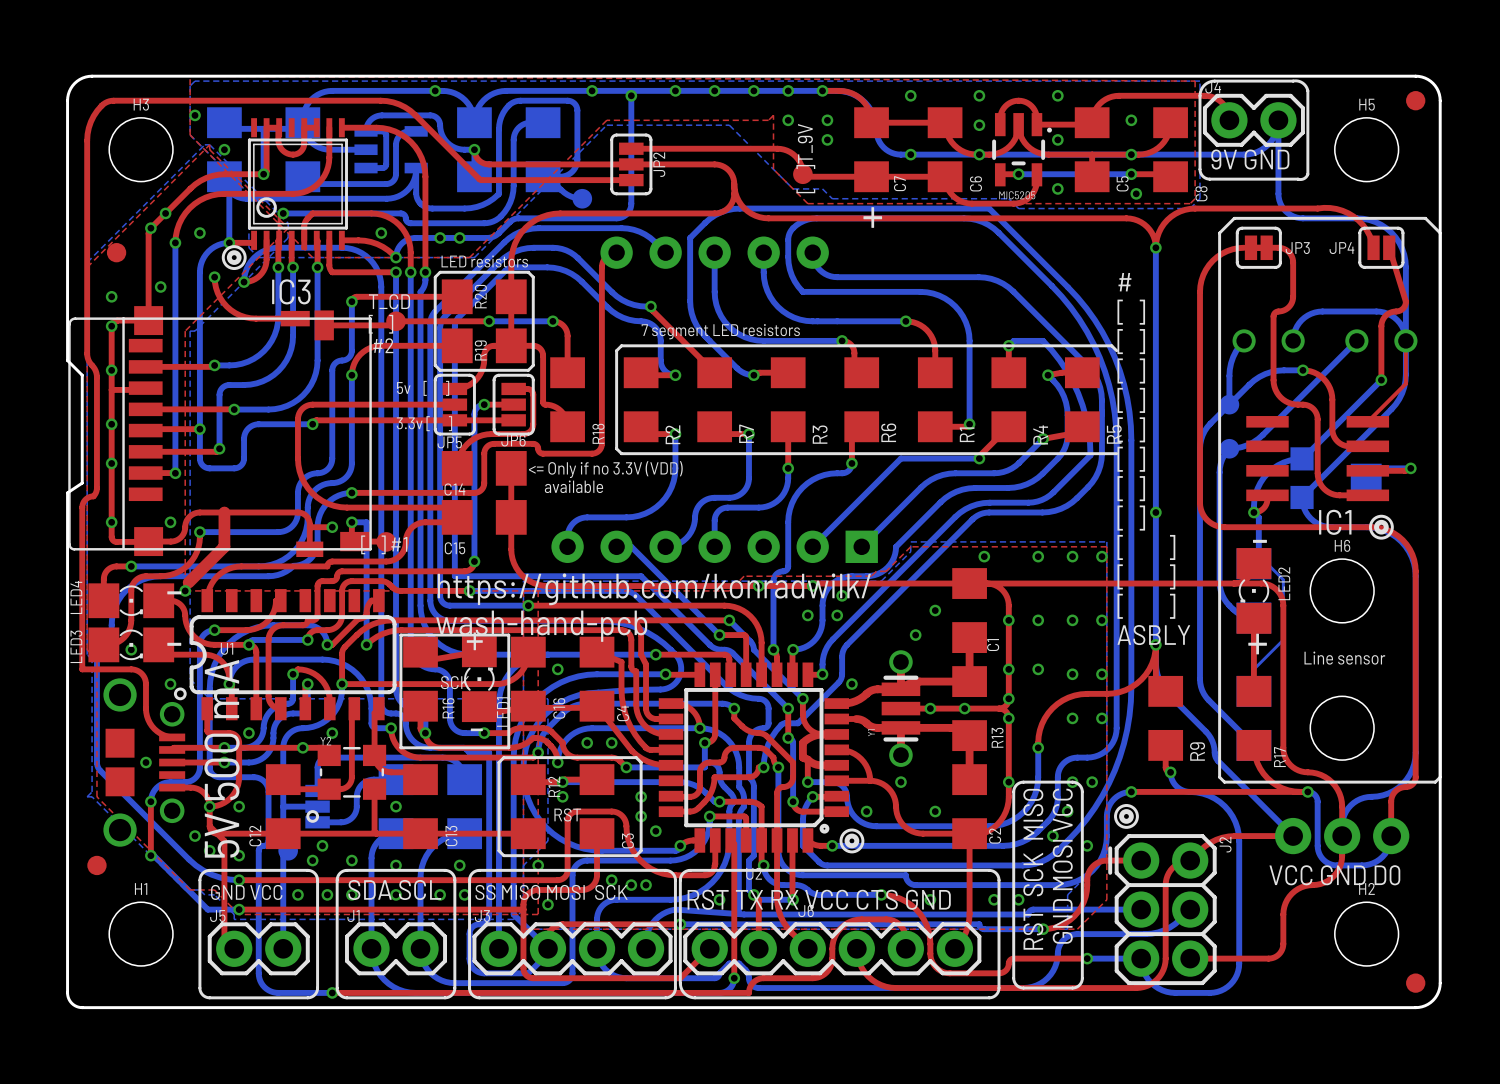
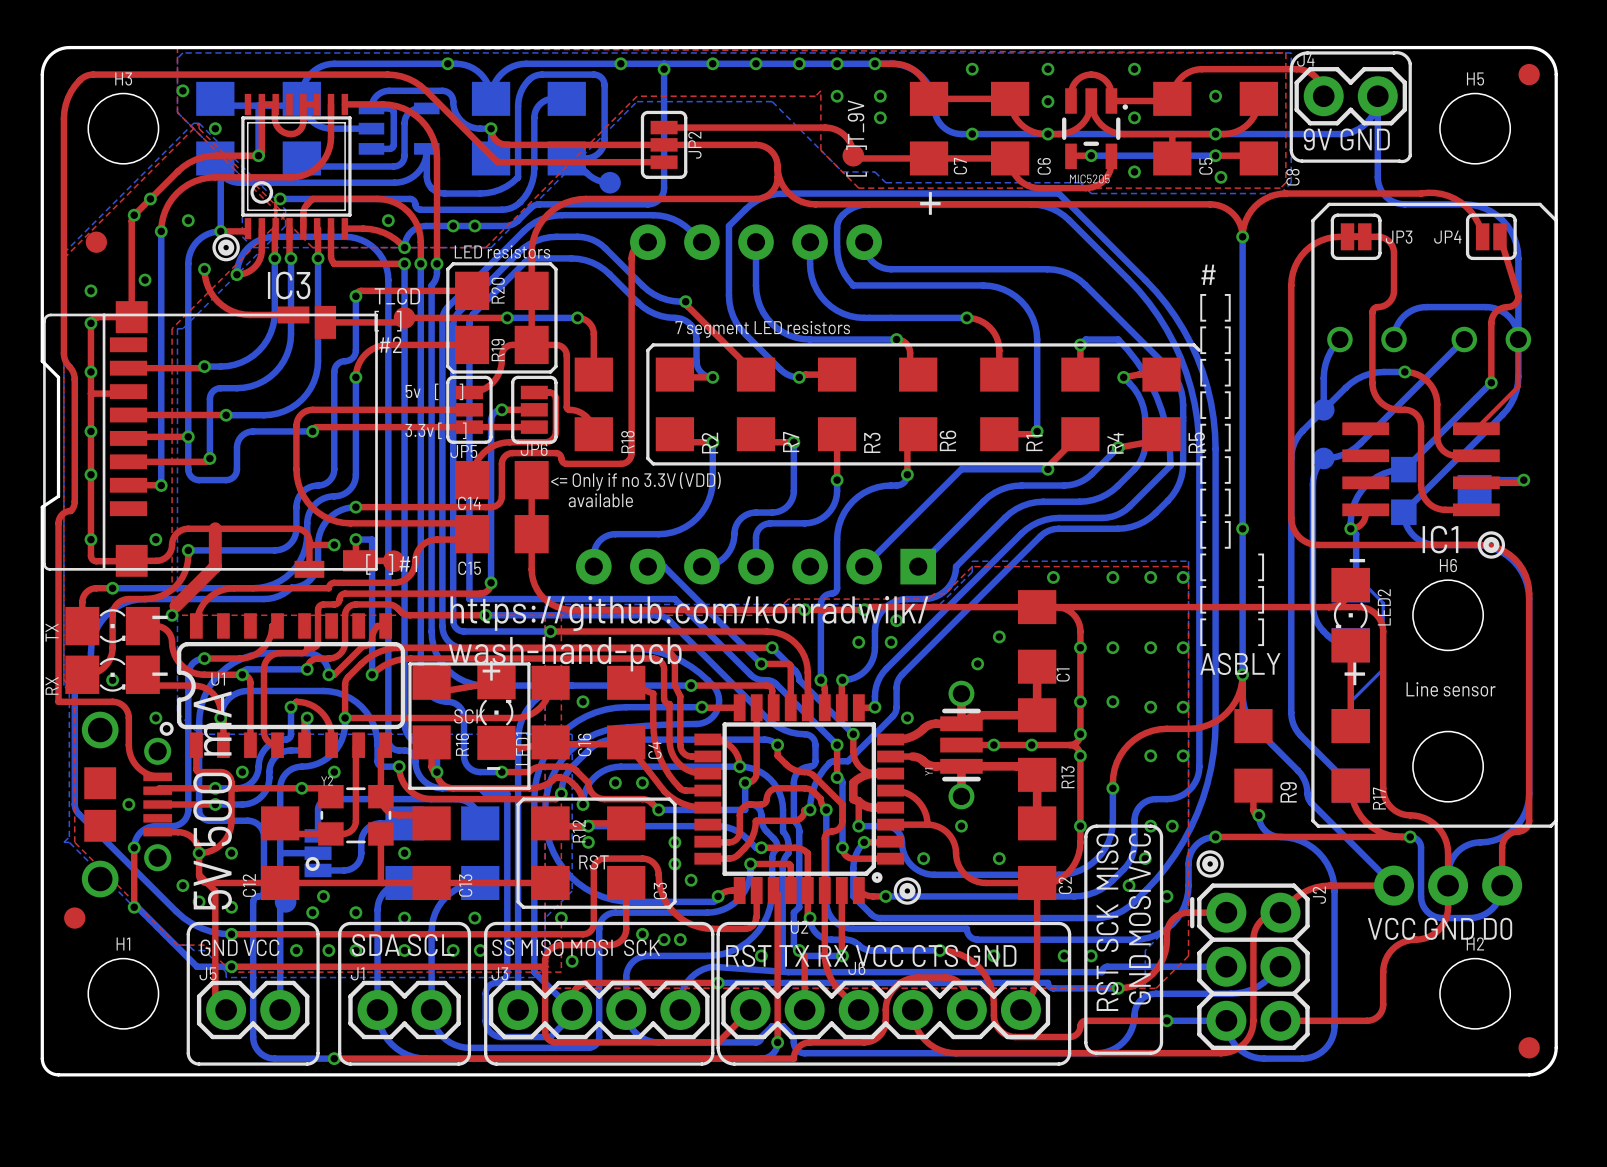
LED4 name: LED4 (76, 597) -> TX (52, 632)
LED3 name: LED3 (76, 646) -> RX (52, 685)

